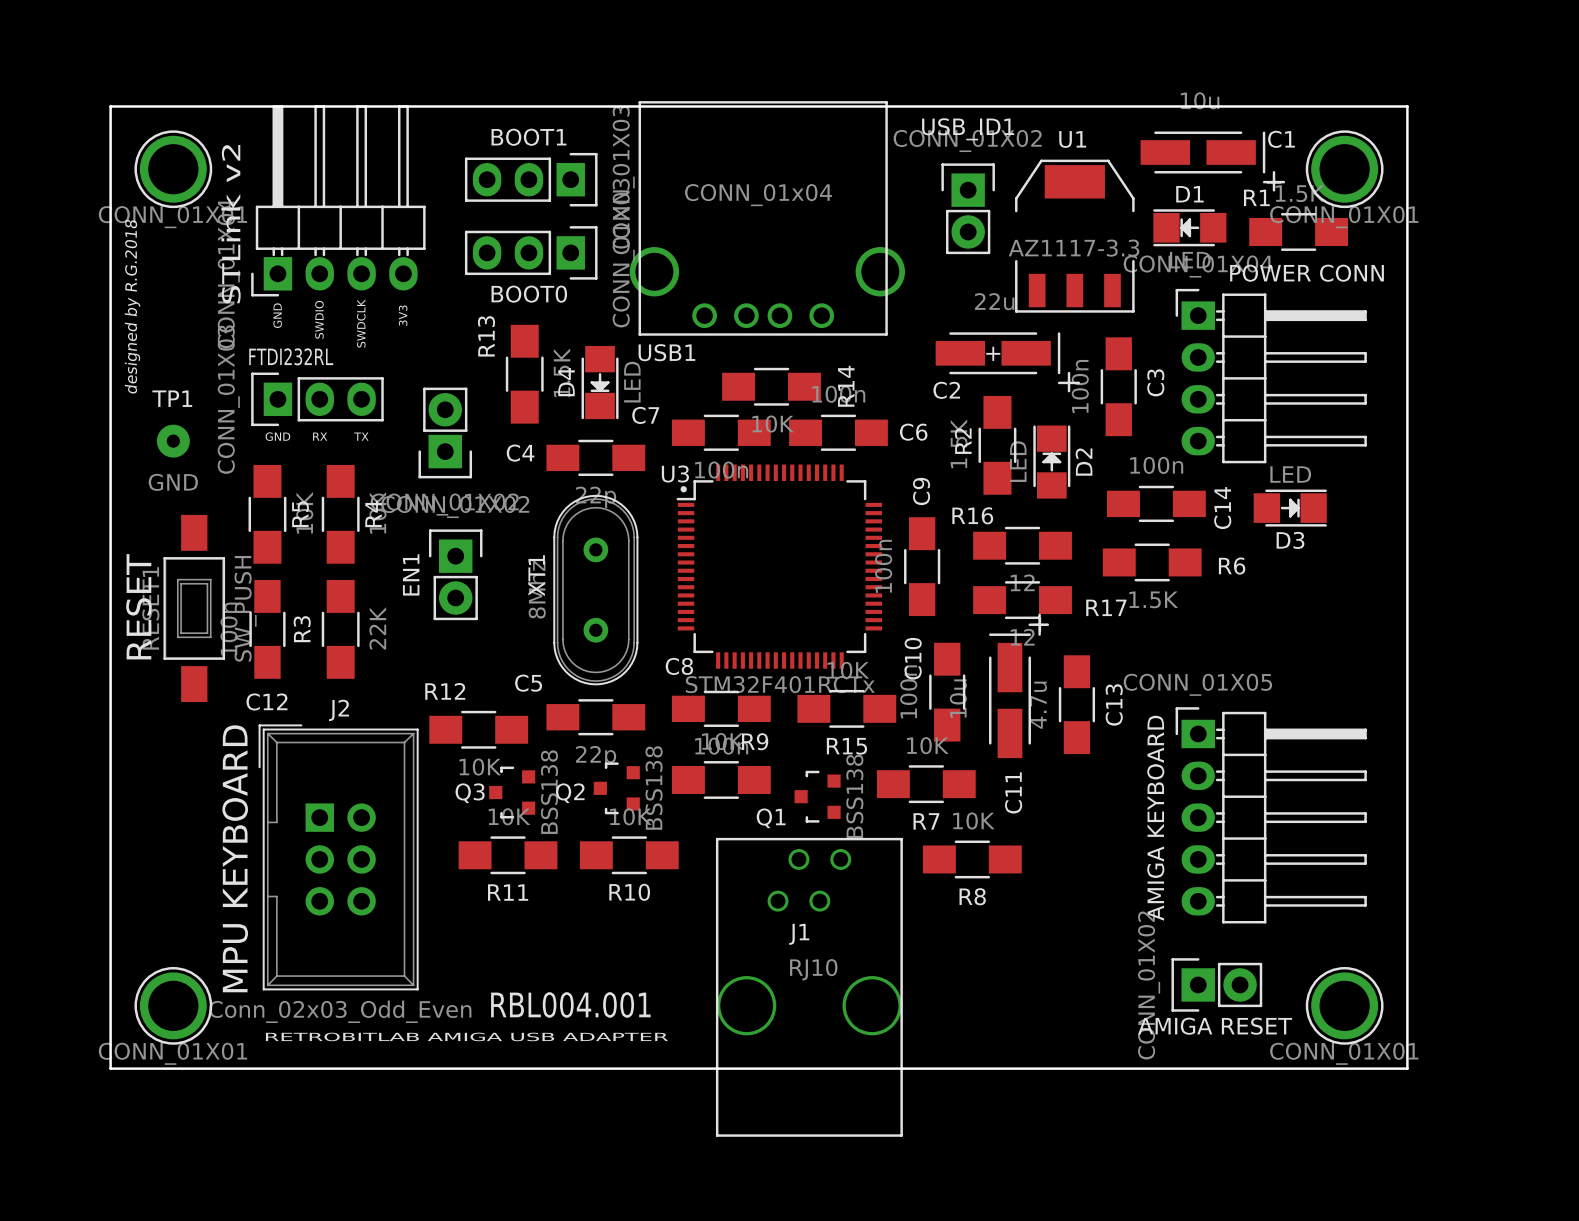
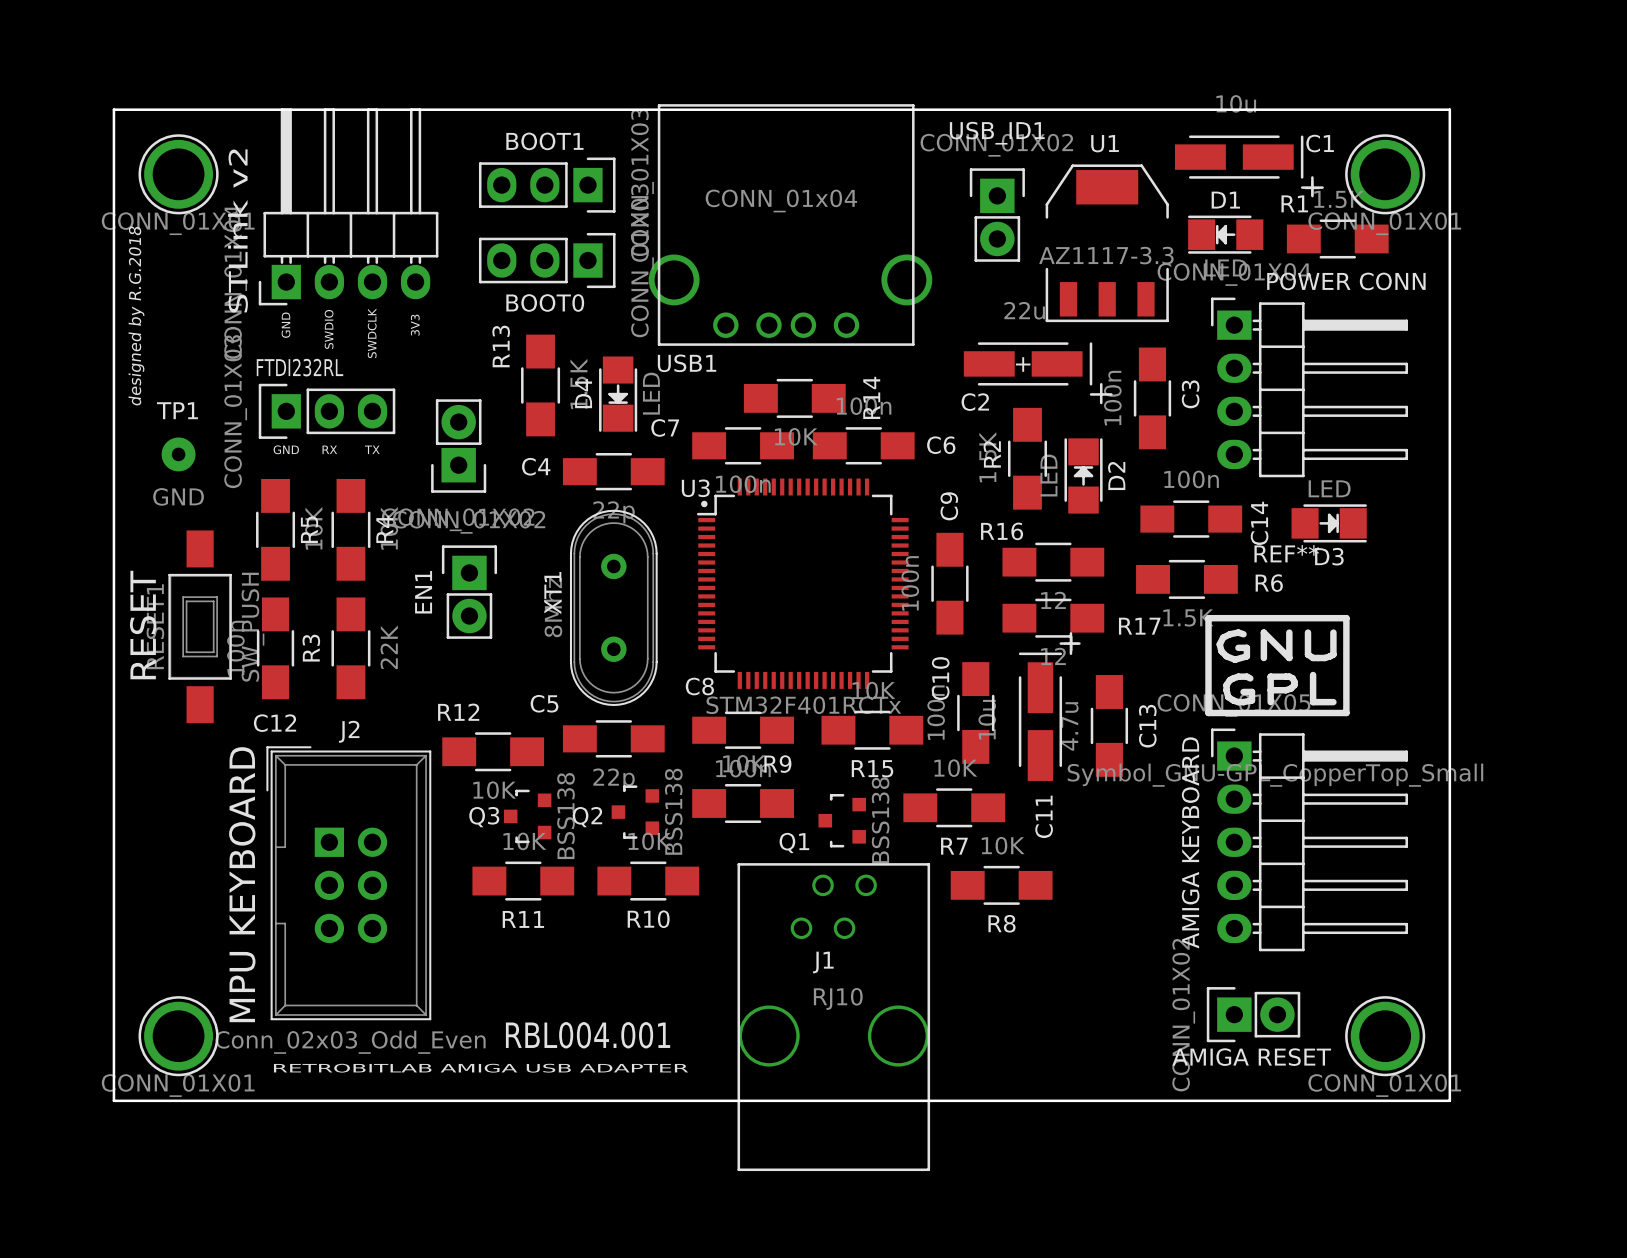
REF**: none -> Symbol_GNU-GPL_CopperTop_Small (1277, 665)

